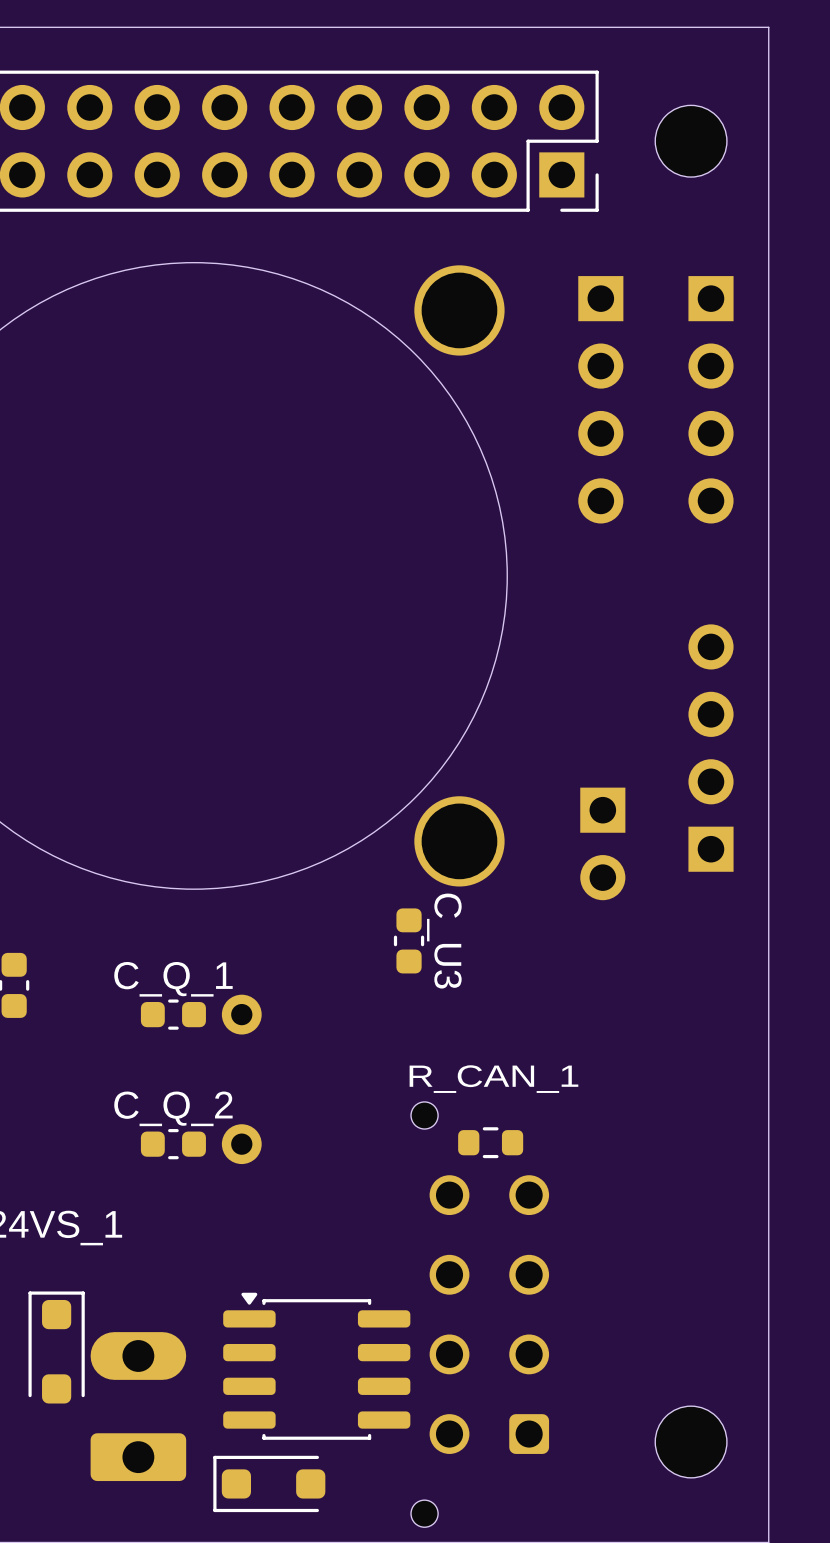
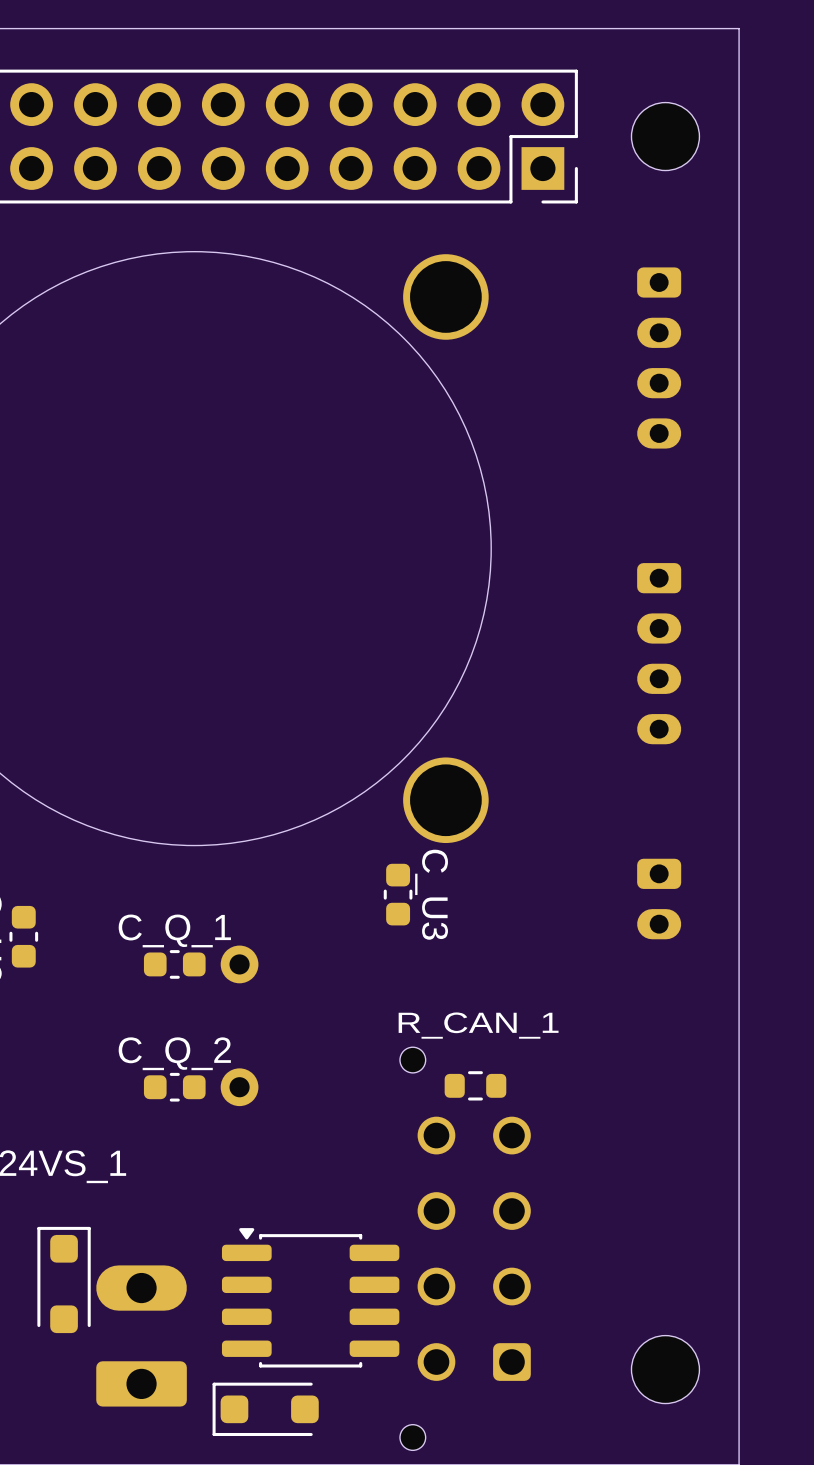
part: none -> (659, 357)
part: (600, 399) -> none
part: (711, 399) -> none
part: none -> (659, 653)
part: (711, 748) -> none
part: (602, 843) -> none
part: none -> (659, 899)

